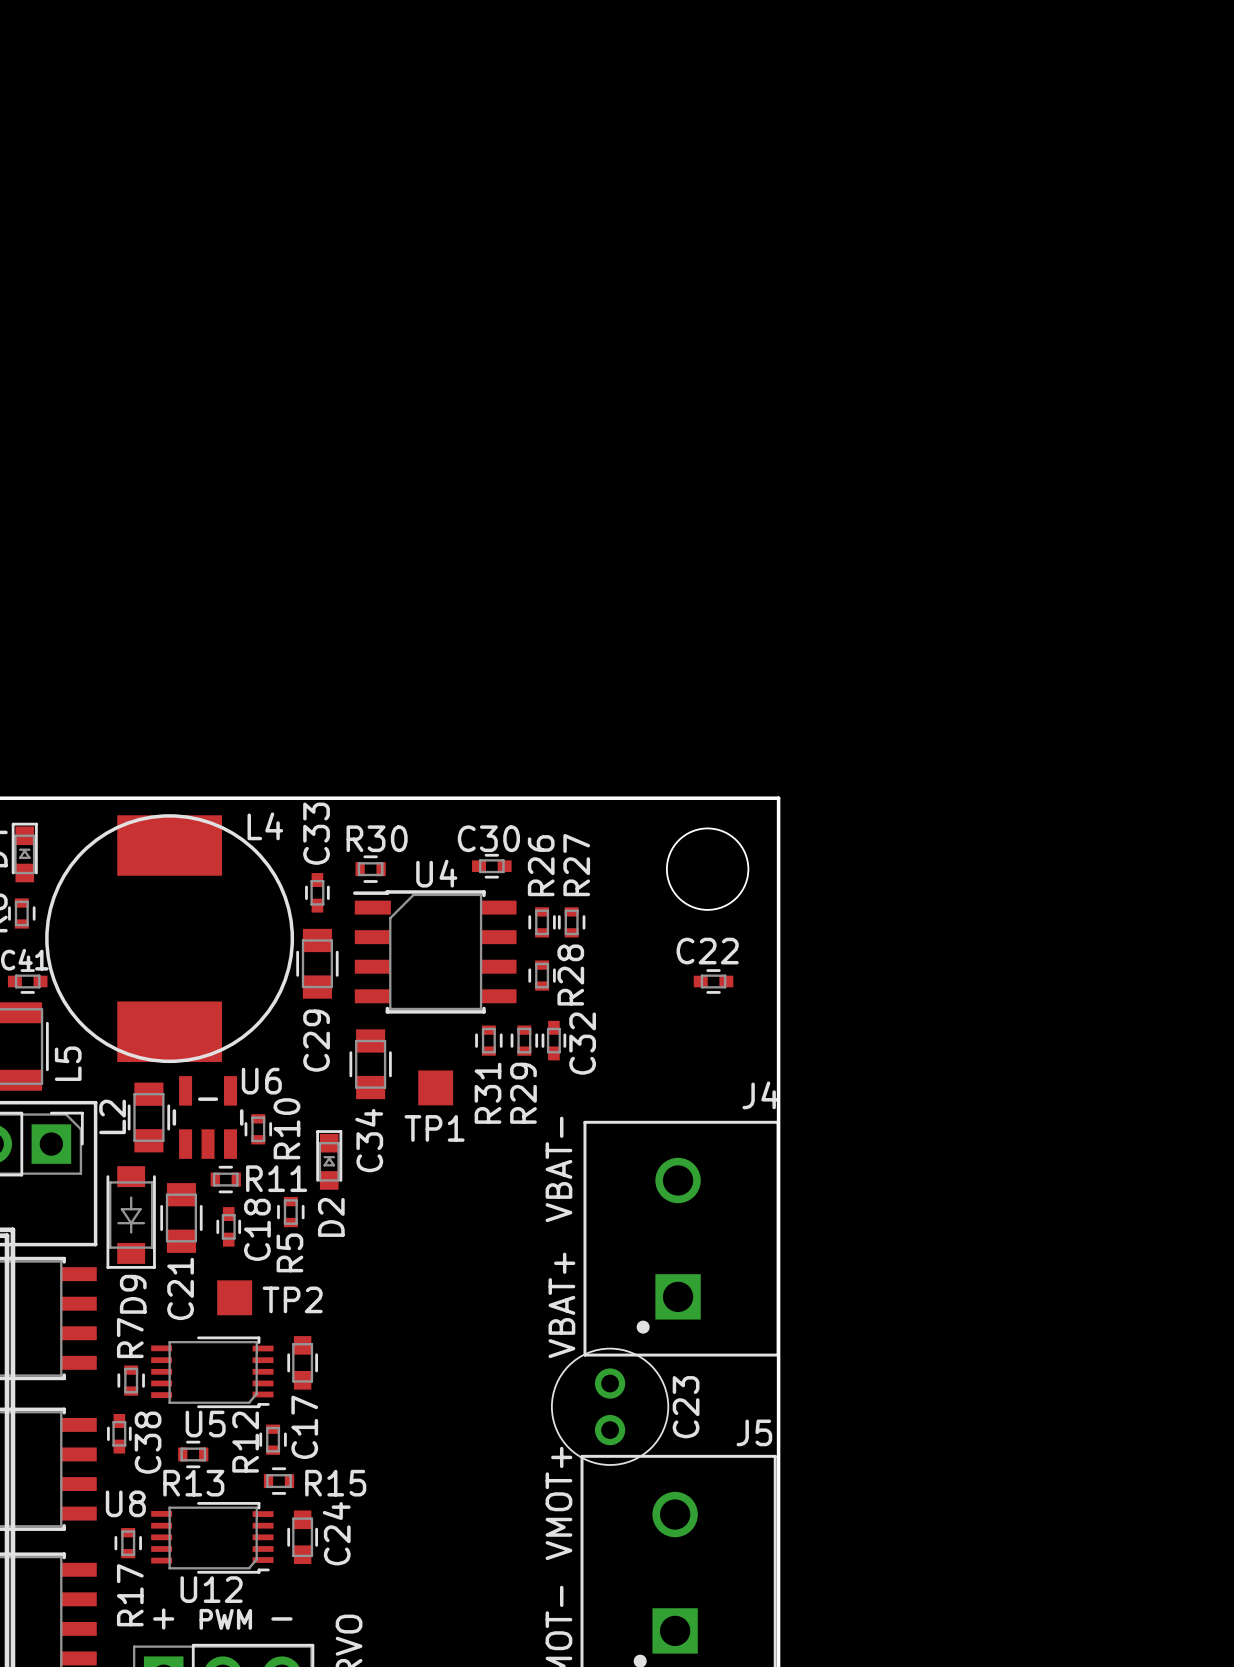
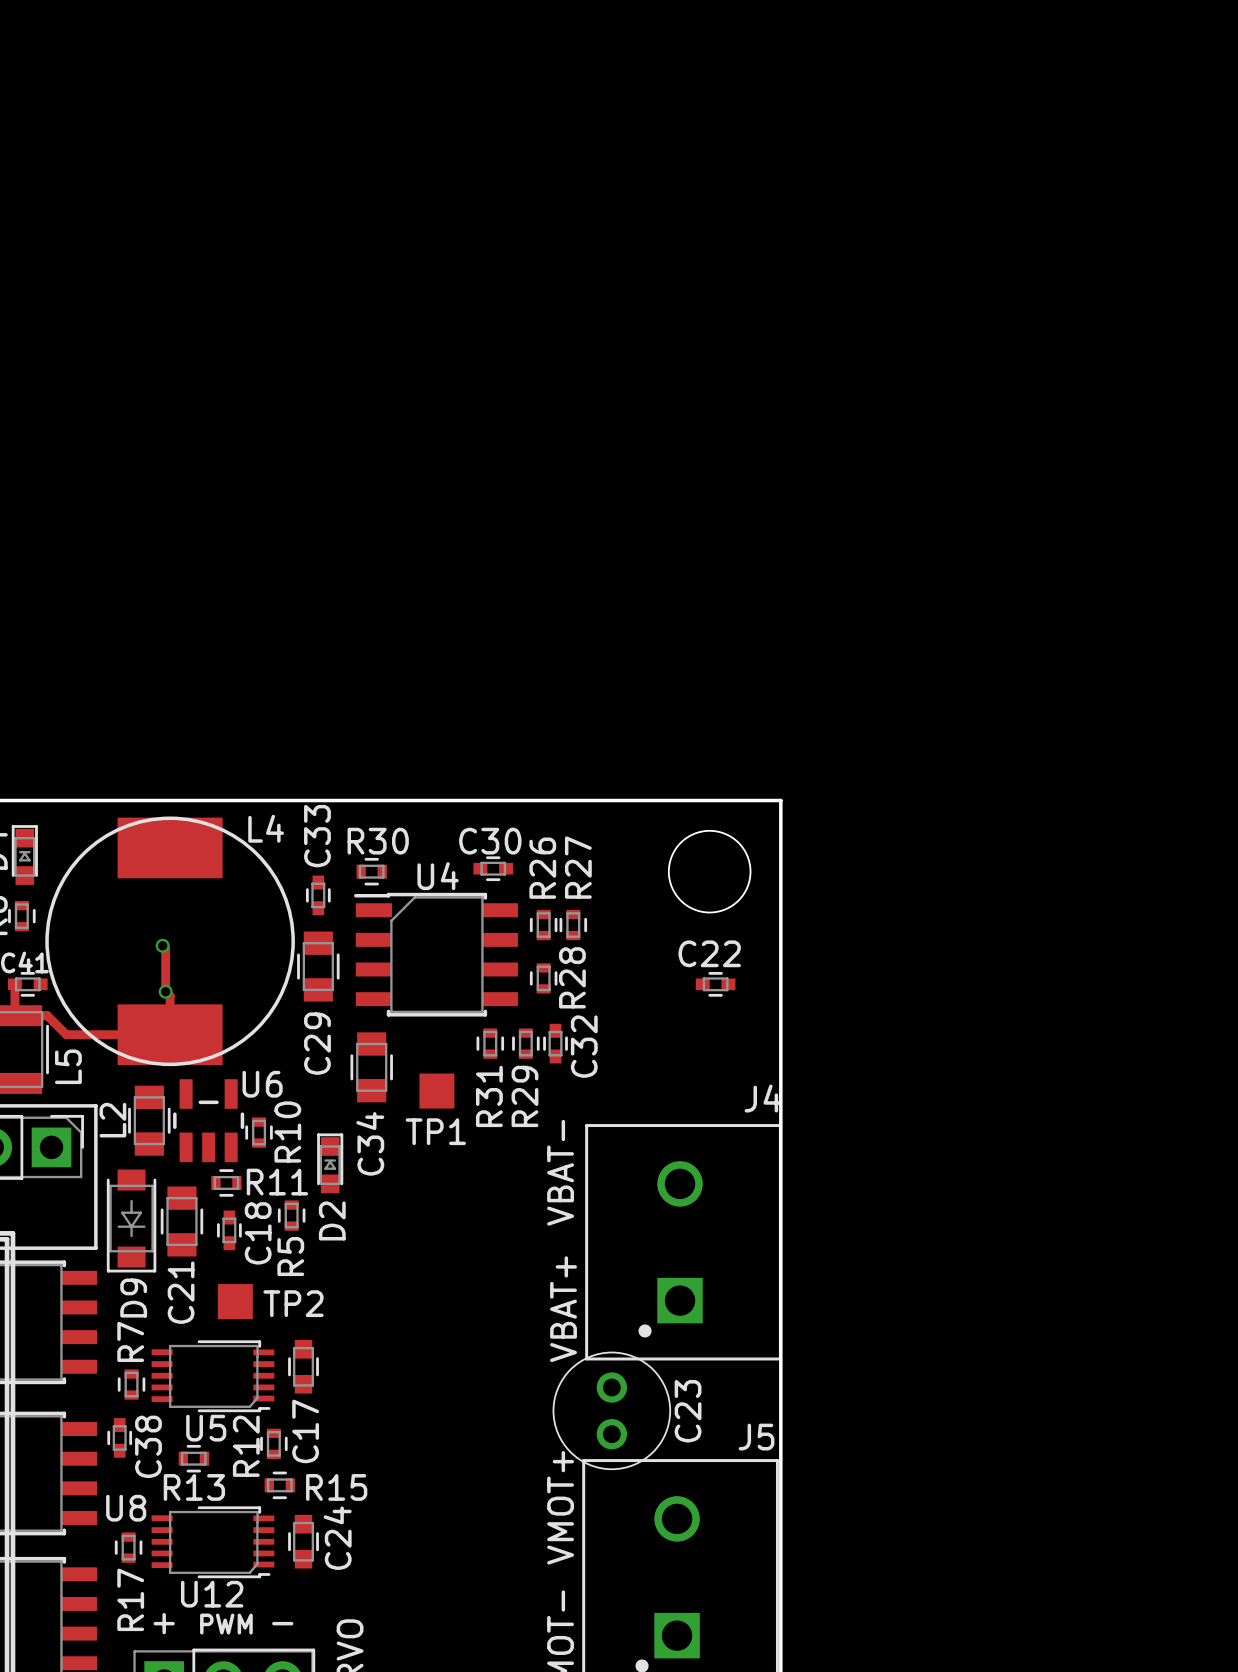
track: none -> (162, 945) (165, 948) (165, 991) (170, 996) (170, 1034) (66, 1034) (47, 1015) (12, 1015) (14, 1013) (14, 984)
via: none -> (162, 945)
via: none -> (165, 991)

